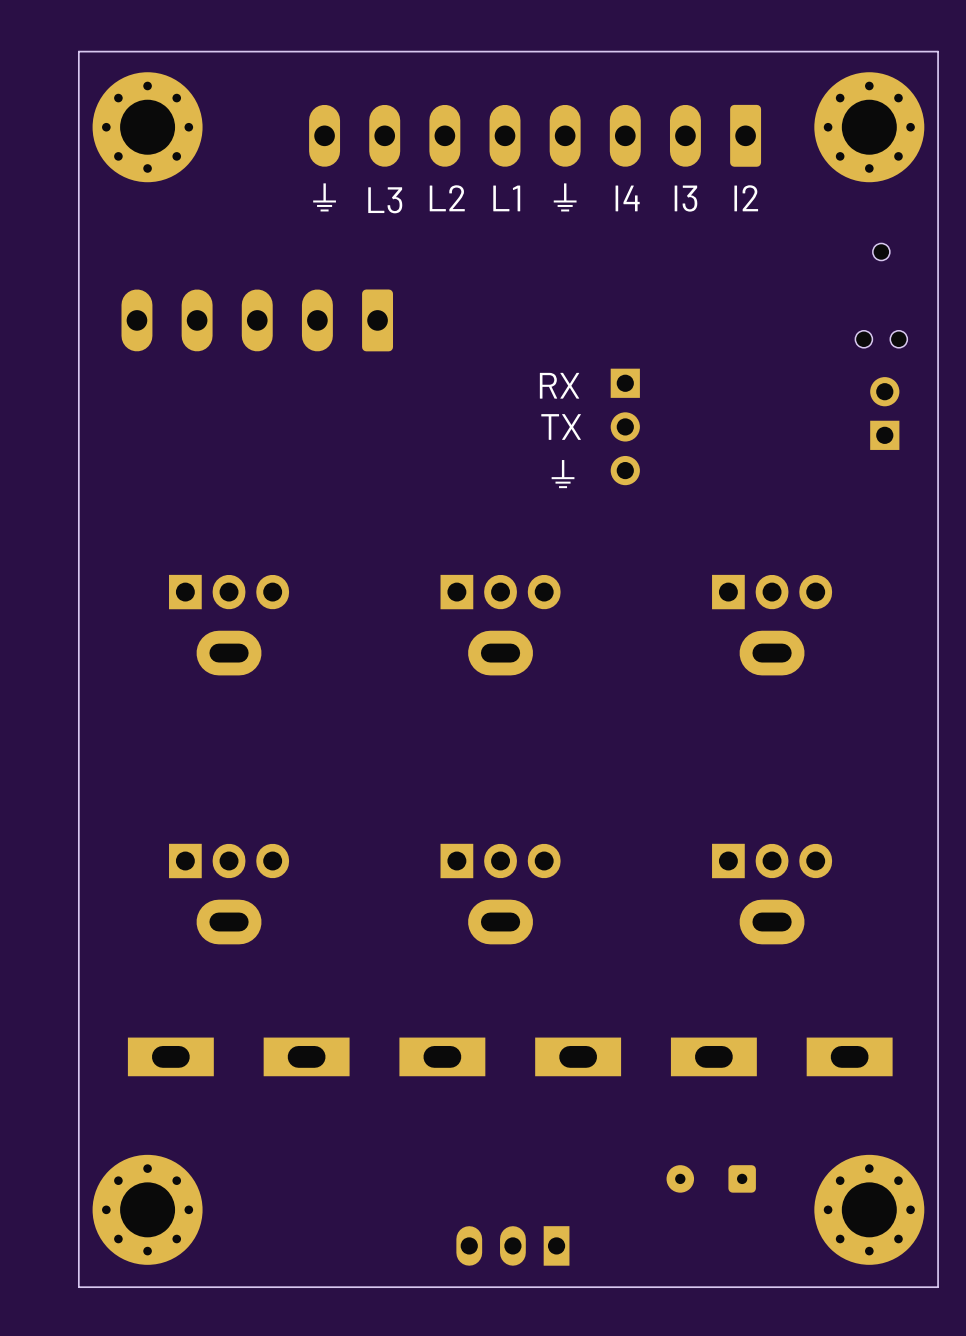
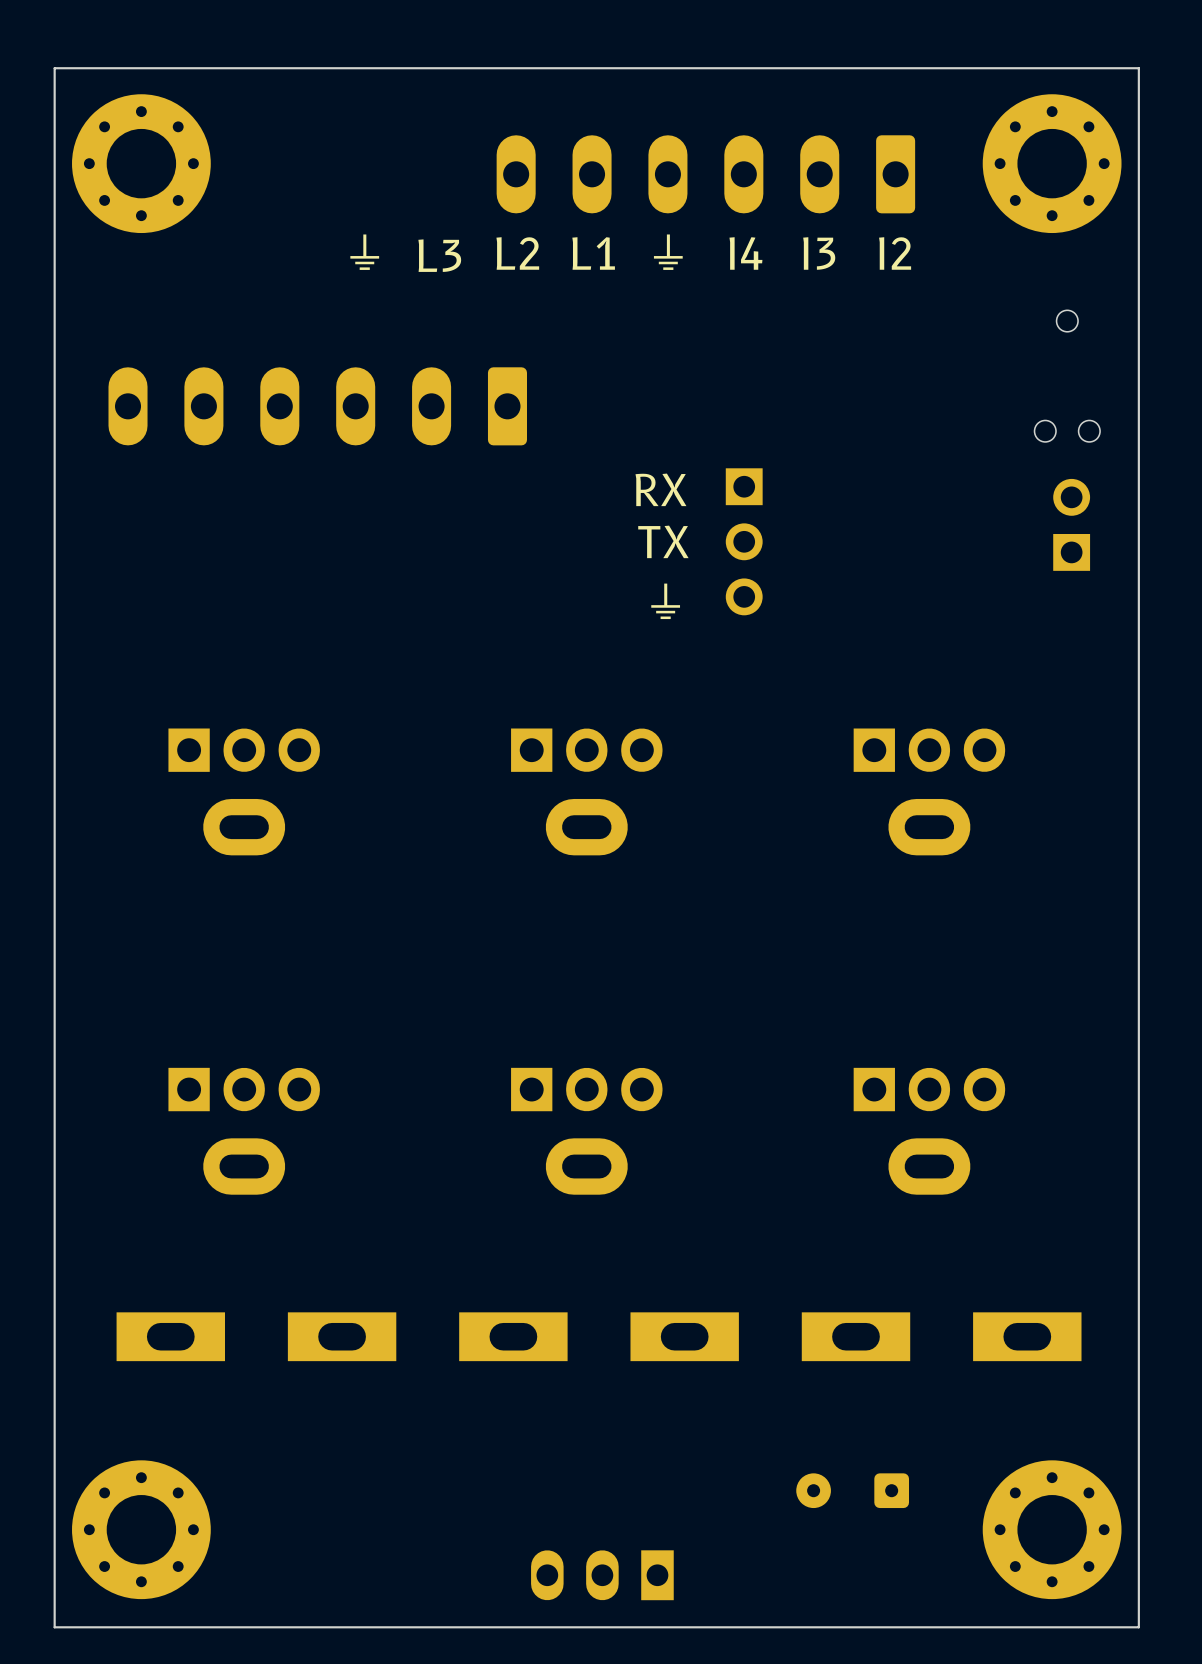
part: (535, 135) -> none
part: none -> (705, 174)
part: none -> (317, 406)
part: (257, 320) -> none

